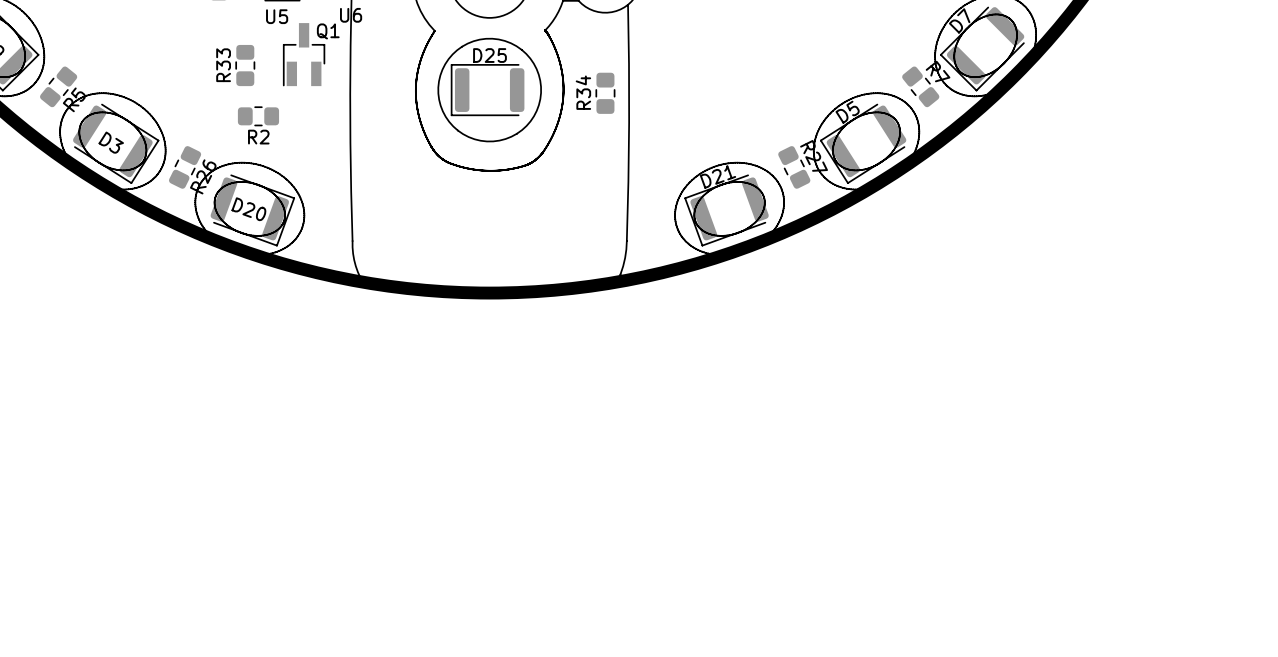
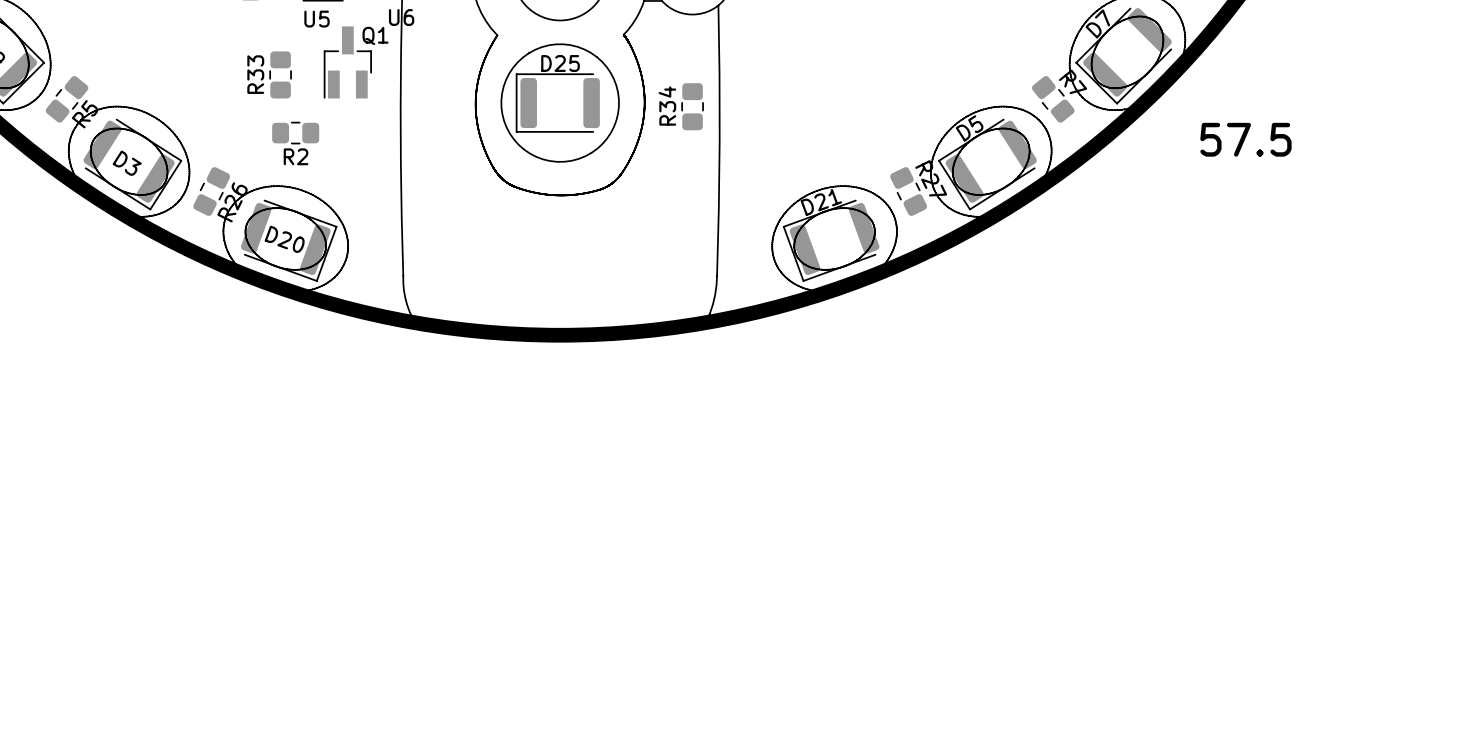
text: none -> 57.5 (1245, 139)

